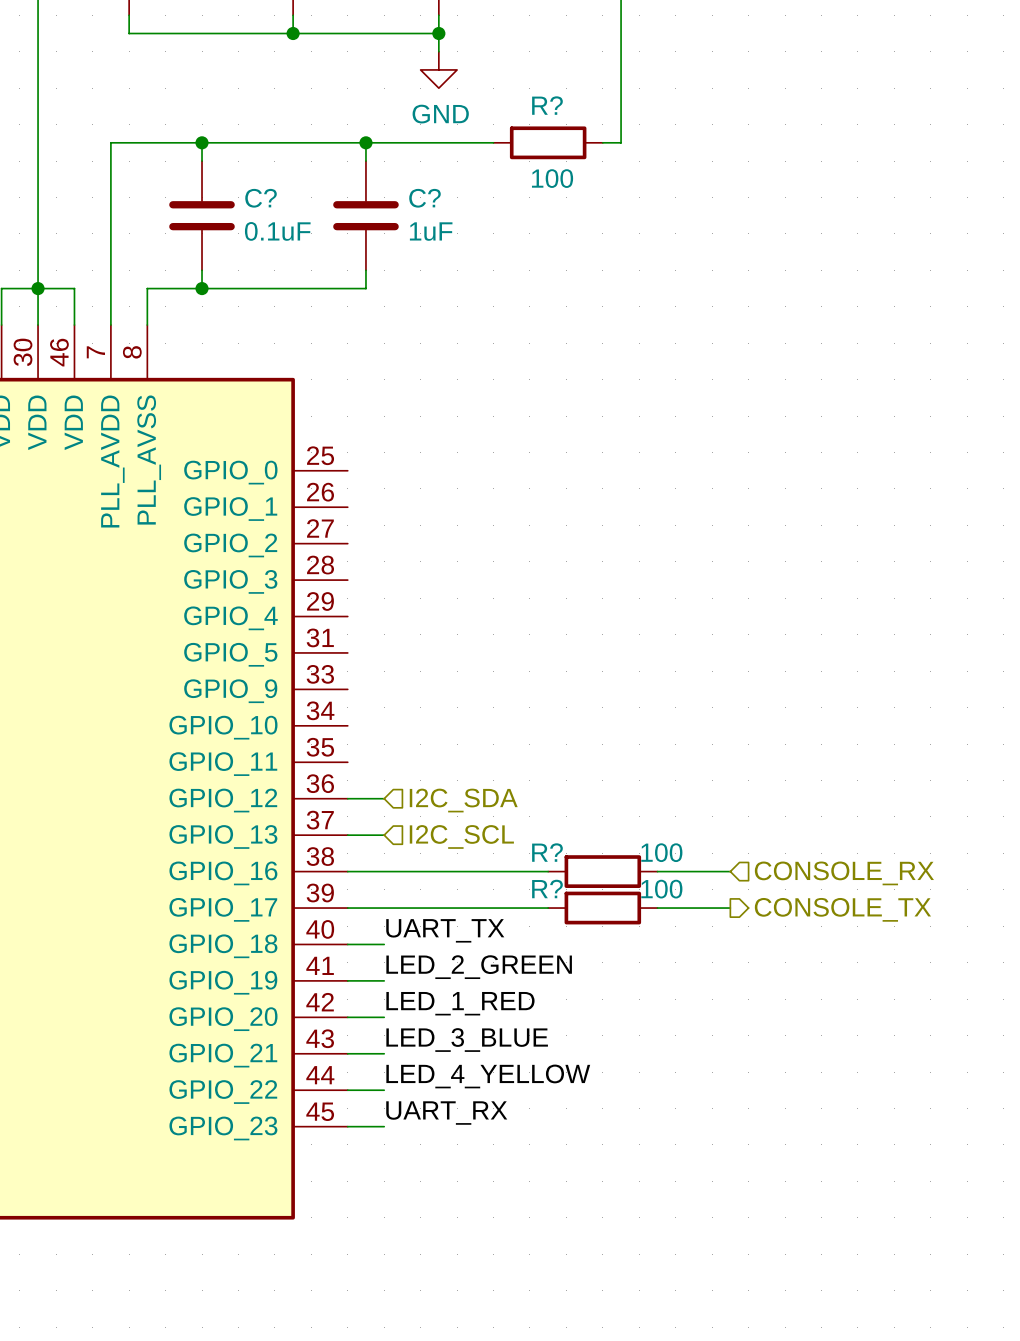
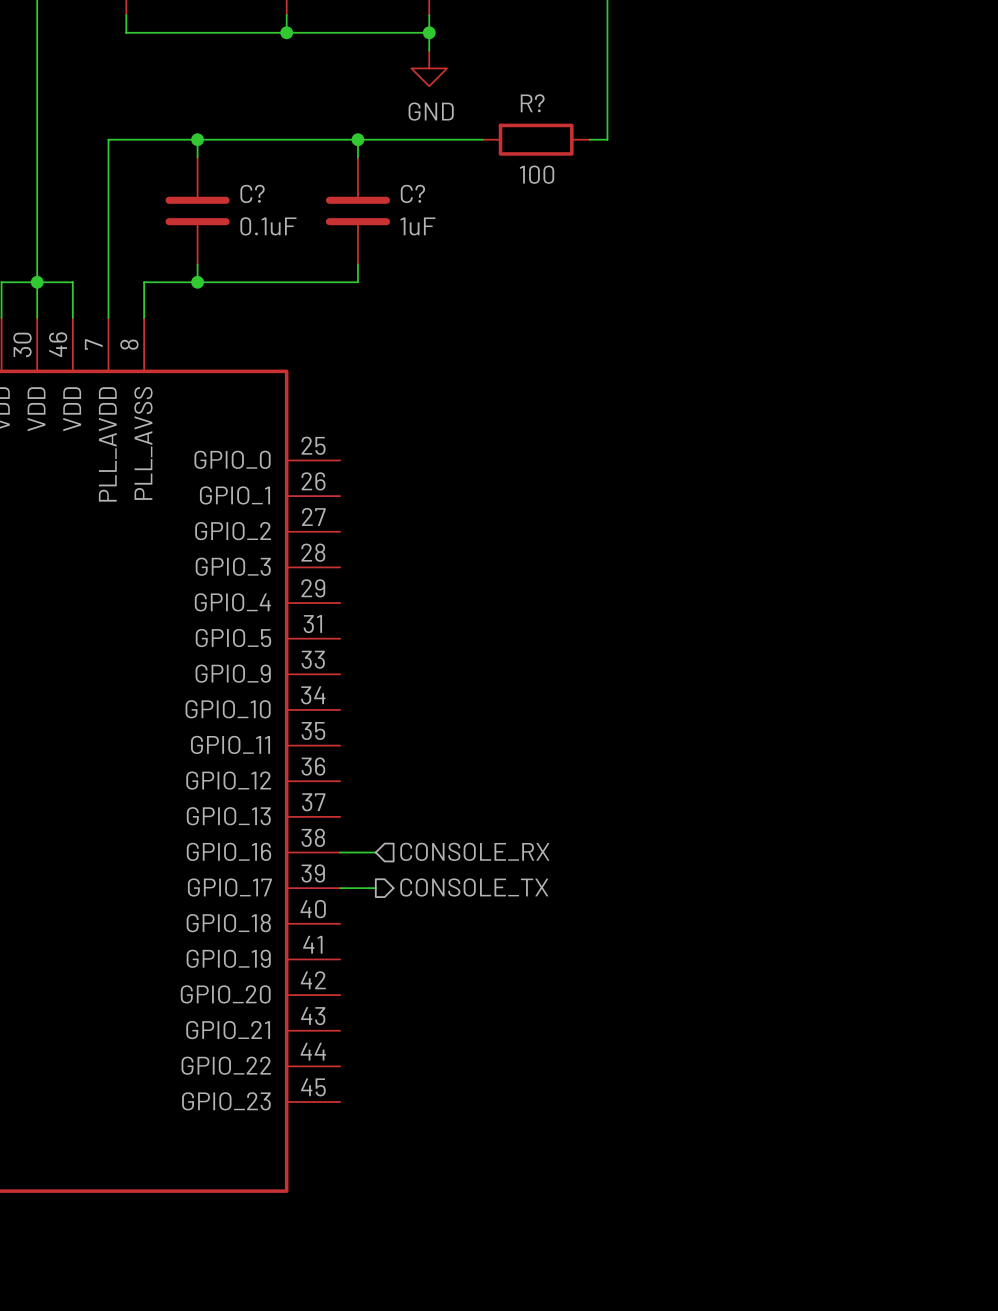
wire: (347, 798) (384, 798) -> none
hierarchical label: I2C_SDA (463, 800) -> none
wire: (347, 835) (384, 835) -> none
hierarchical label: I2C_SCL (461, 836) -> none
wire: (384, 871) (548, 871) -> none
R?: 100 (602, 871) -> none
wire: (657, 871) (730, 871) -> none
hierarchical label position: CONSOLE_RX (844, 873) -> CONSOLE_RX (474, 851)
wire: (384, 908) (548, 908) -> none
R?: 100 (602, 908) -> none
wire: (657, 908) (730, 908) -> none
hierarchical label position: CONSOLE_TX (842, 909) -> CONSOLE_TX (474, 887)
label: UART_TX (445, 930) -> none
wire: (347, 944) (384, 944) -> none
label: LED_2_GREEN (479, 967) -> none
wire: (347, 980) (384, 980) -> none
label: LED_1_RED (460, 1003) -> none
wire: (347, 1017) (384, 1017) -> none
label: LED_3_BLUE (467, 1040) -> none
wire: (347, 1053) (384, 1053) -> none
label: LED_4_YELLOW (488, 1076) -> none
wire: (347, 1090) (384, 1090) -> none
label: UART_RX (446, 1113) -> none
wire: (347, 1126) (384, 1126) -> none

